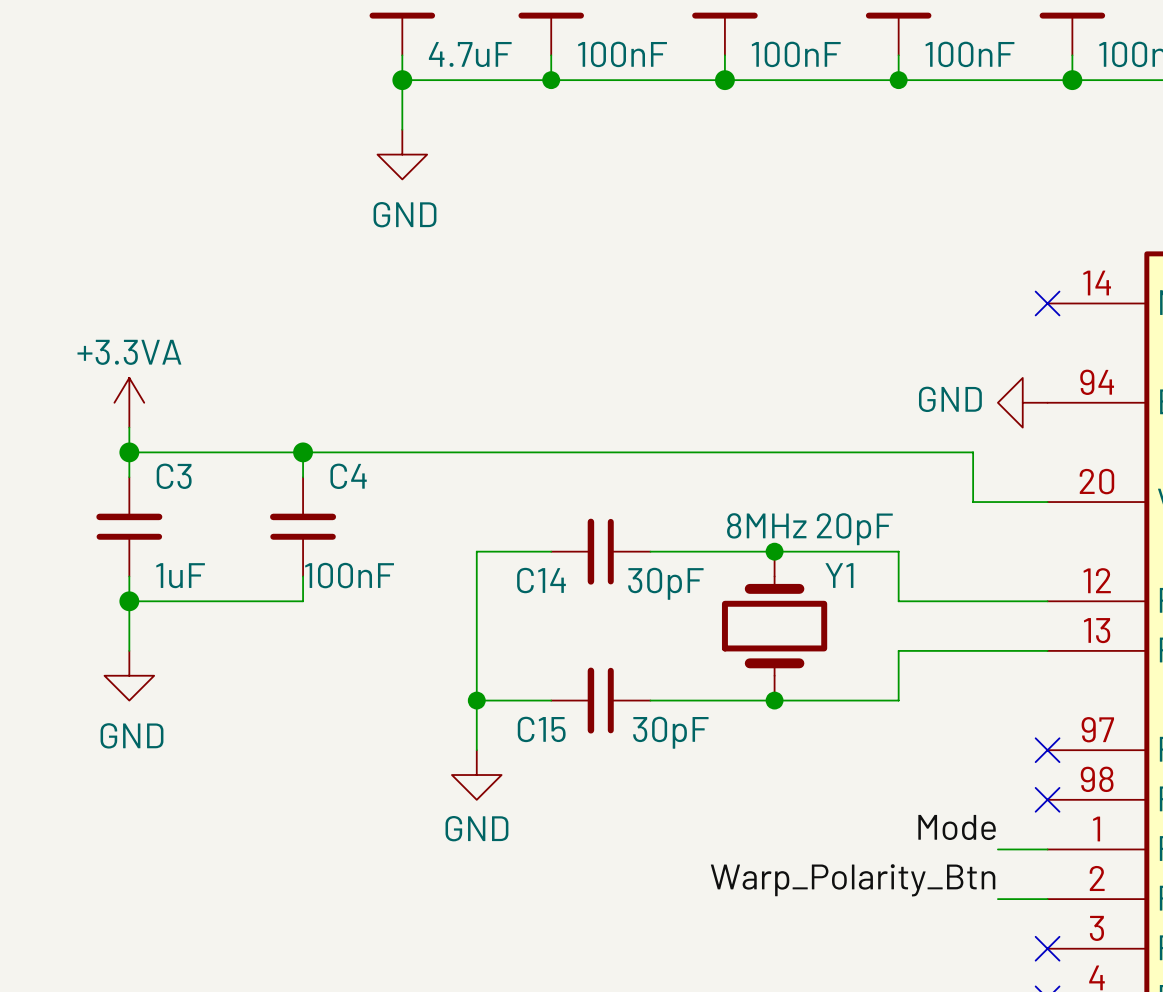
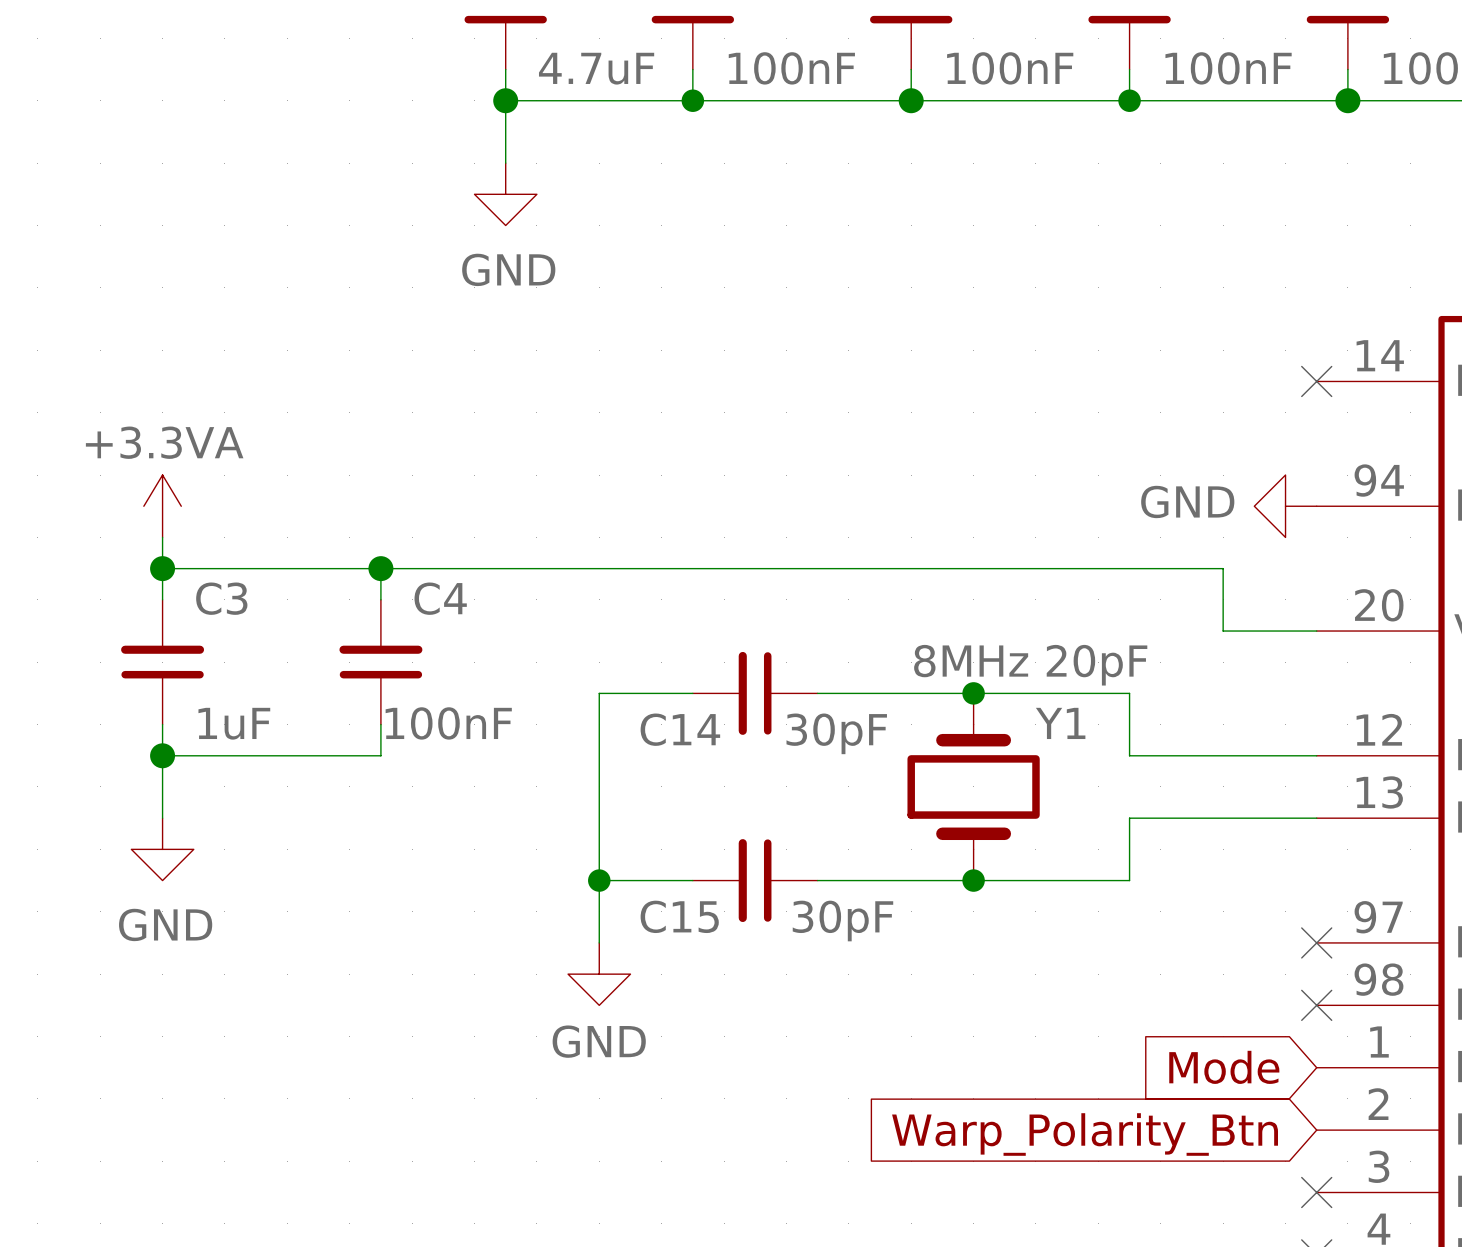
label: Mode (957, 827) -> none
global label: none -> Mode (1224, 1067)
wire: (997, 849) (1047, 849) -> none
label: Warp_Polarity_Btn (853, 880) -> none
wire: (997, 899) (1047, 899) -> none
global label: none -> Warp_Polarity_Btn (1085, 1134)

